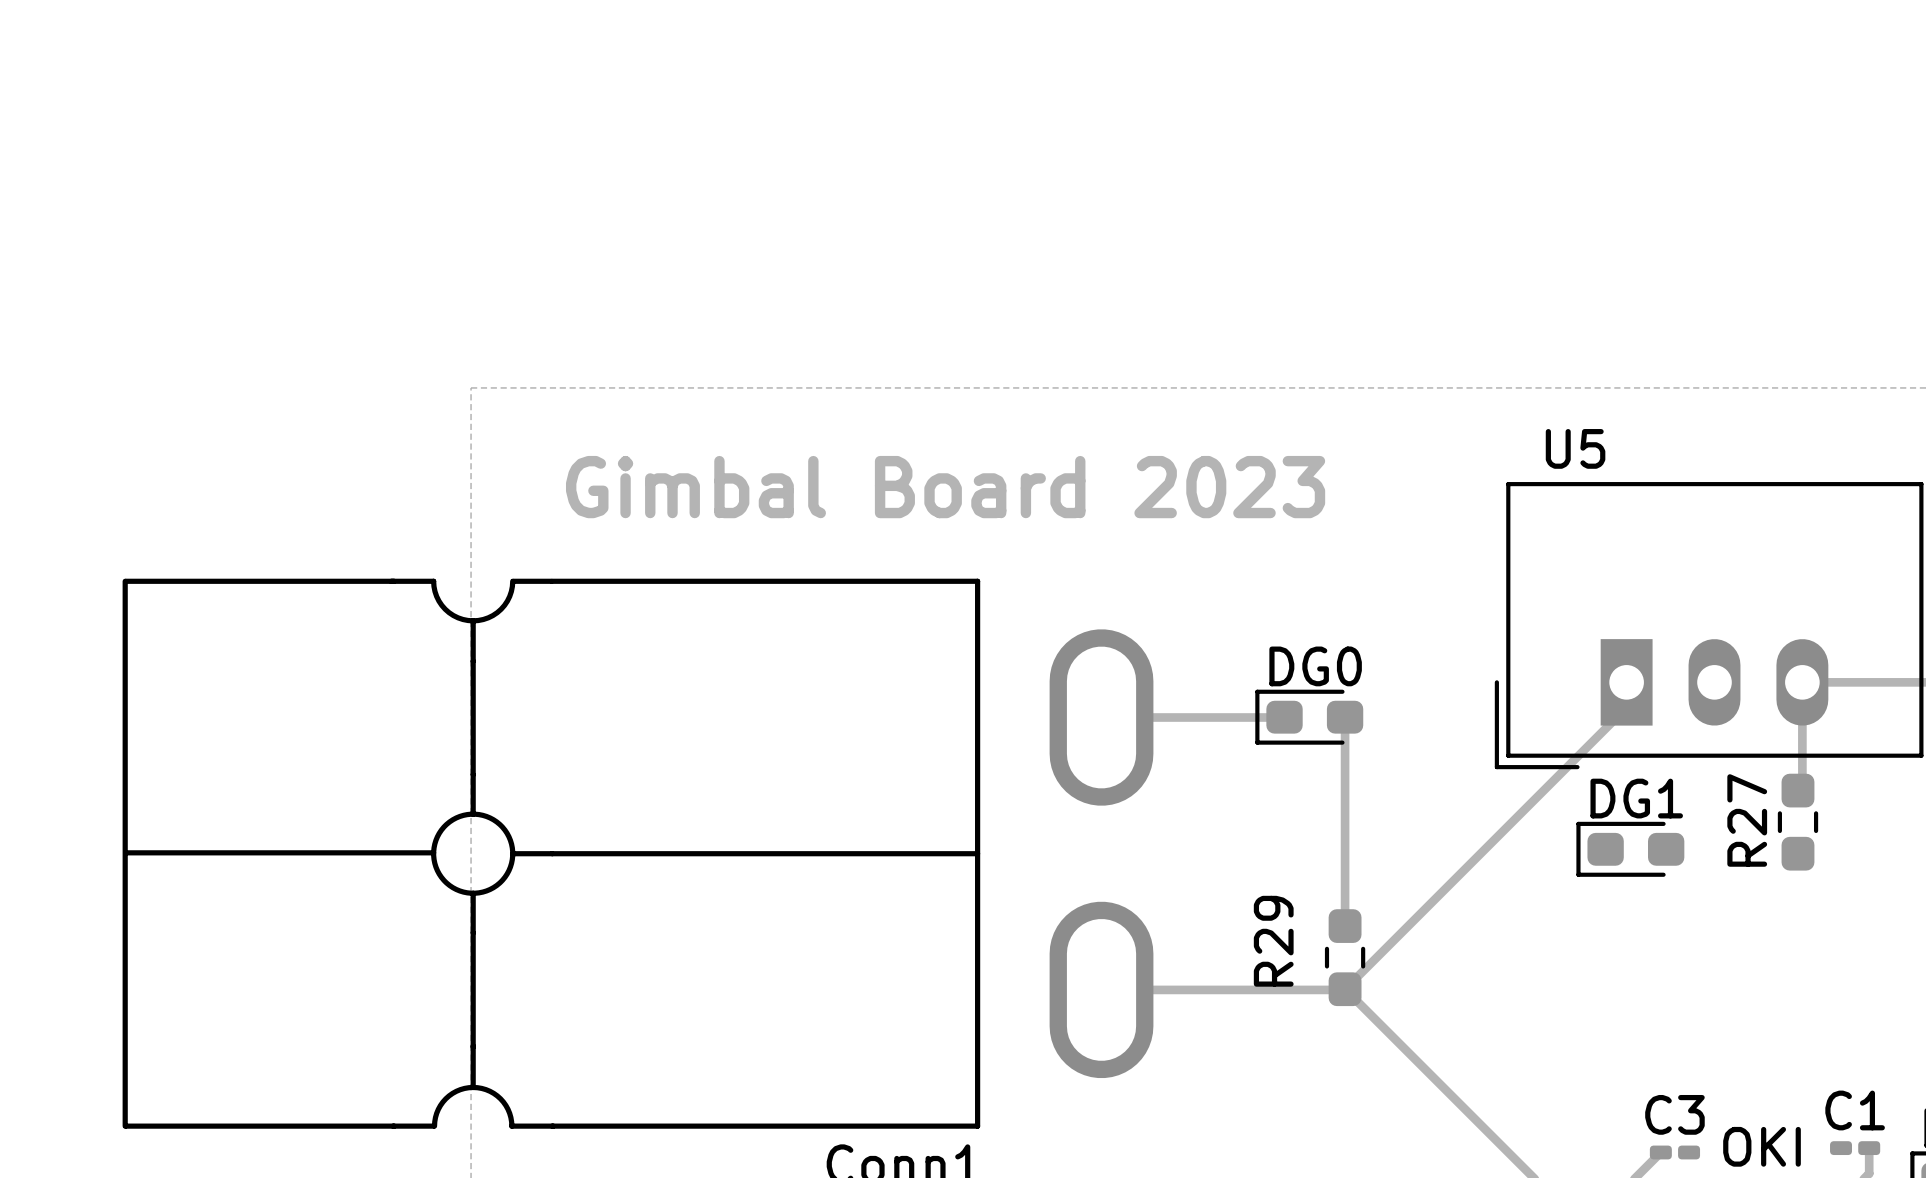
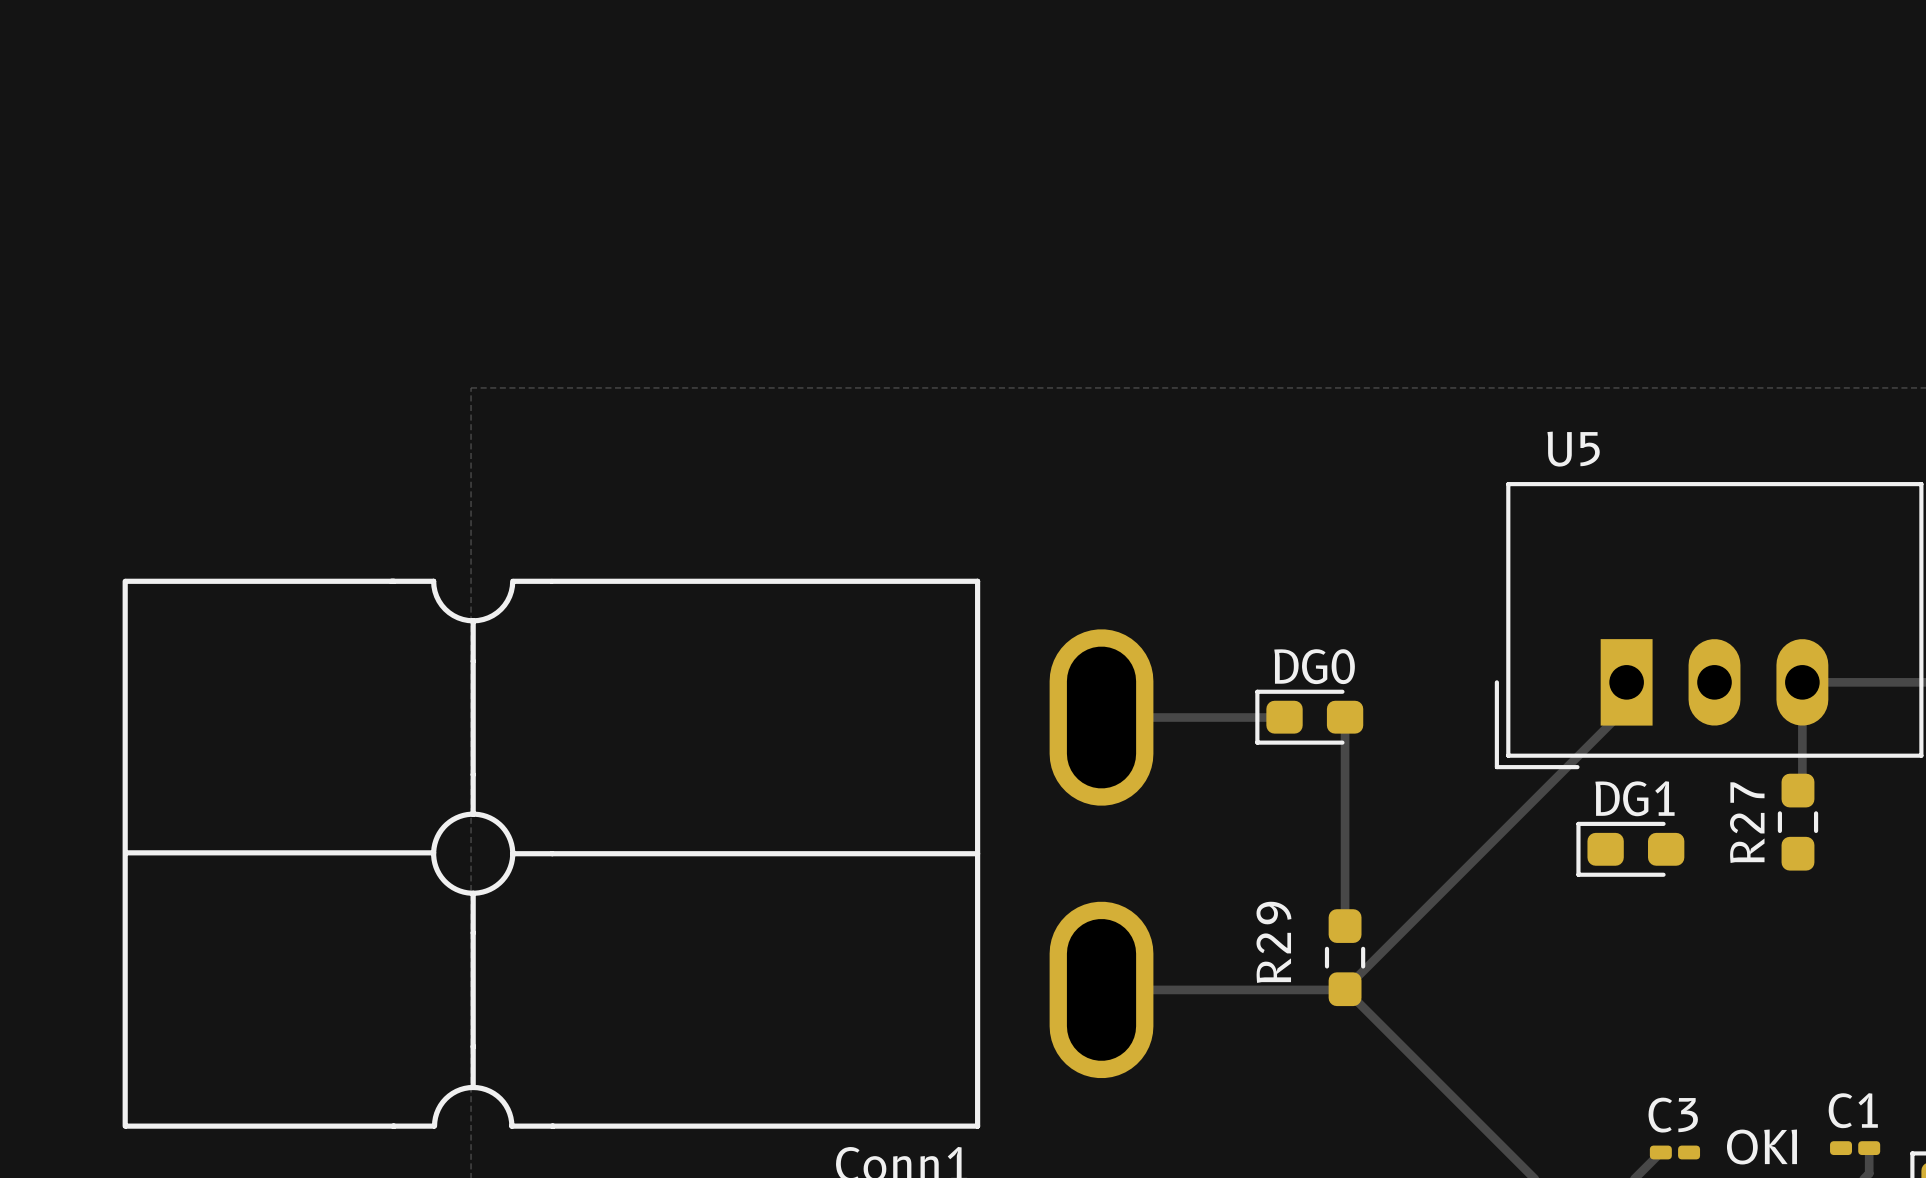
text: Gimbal Board 2023 (945, 487) -> none

